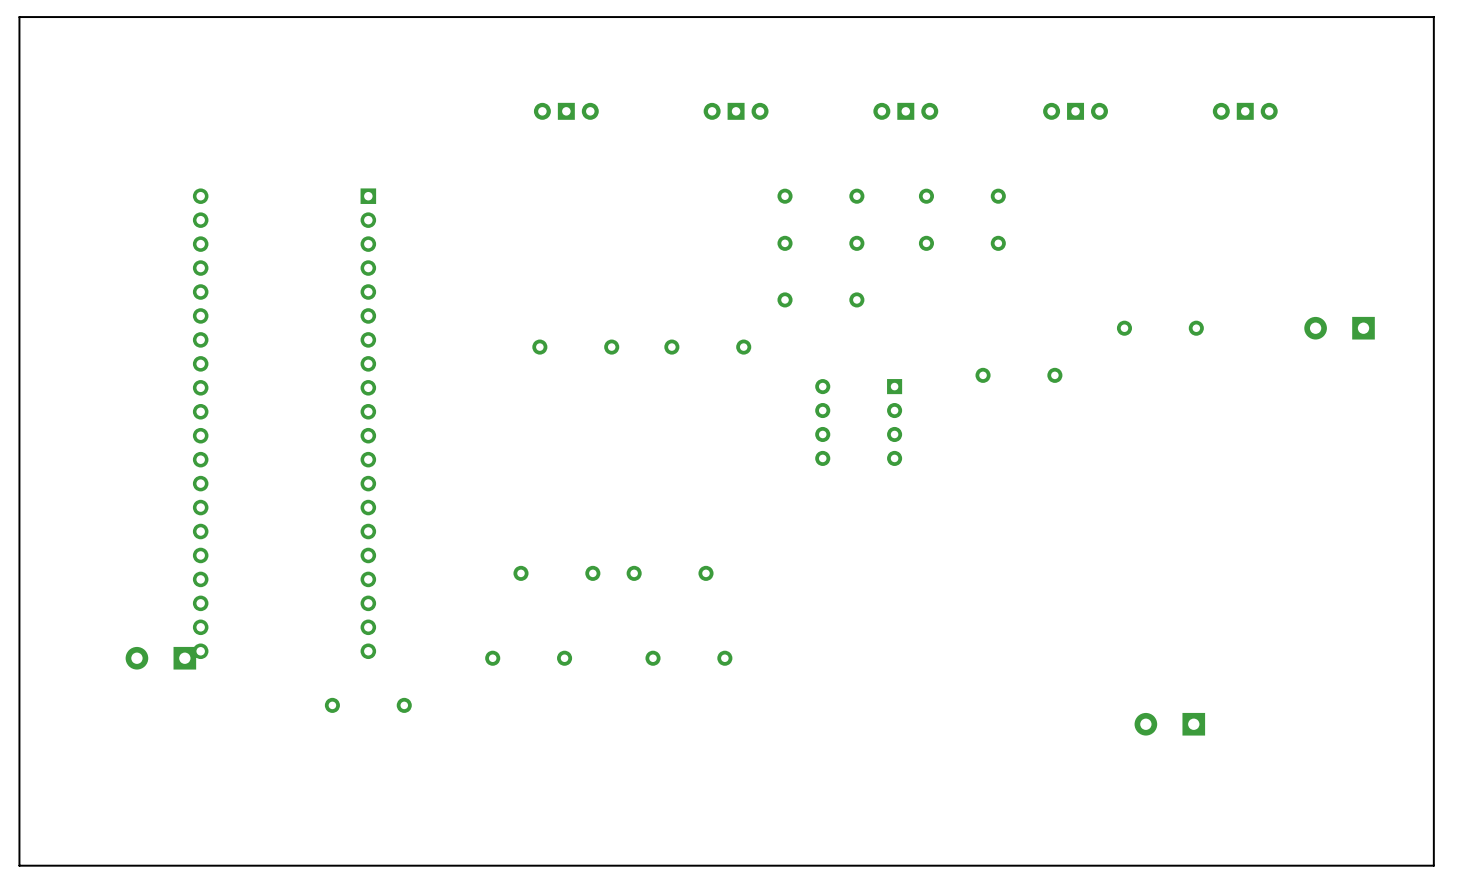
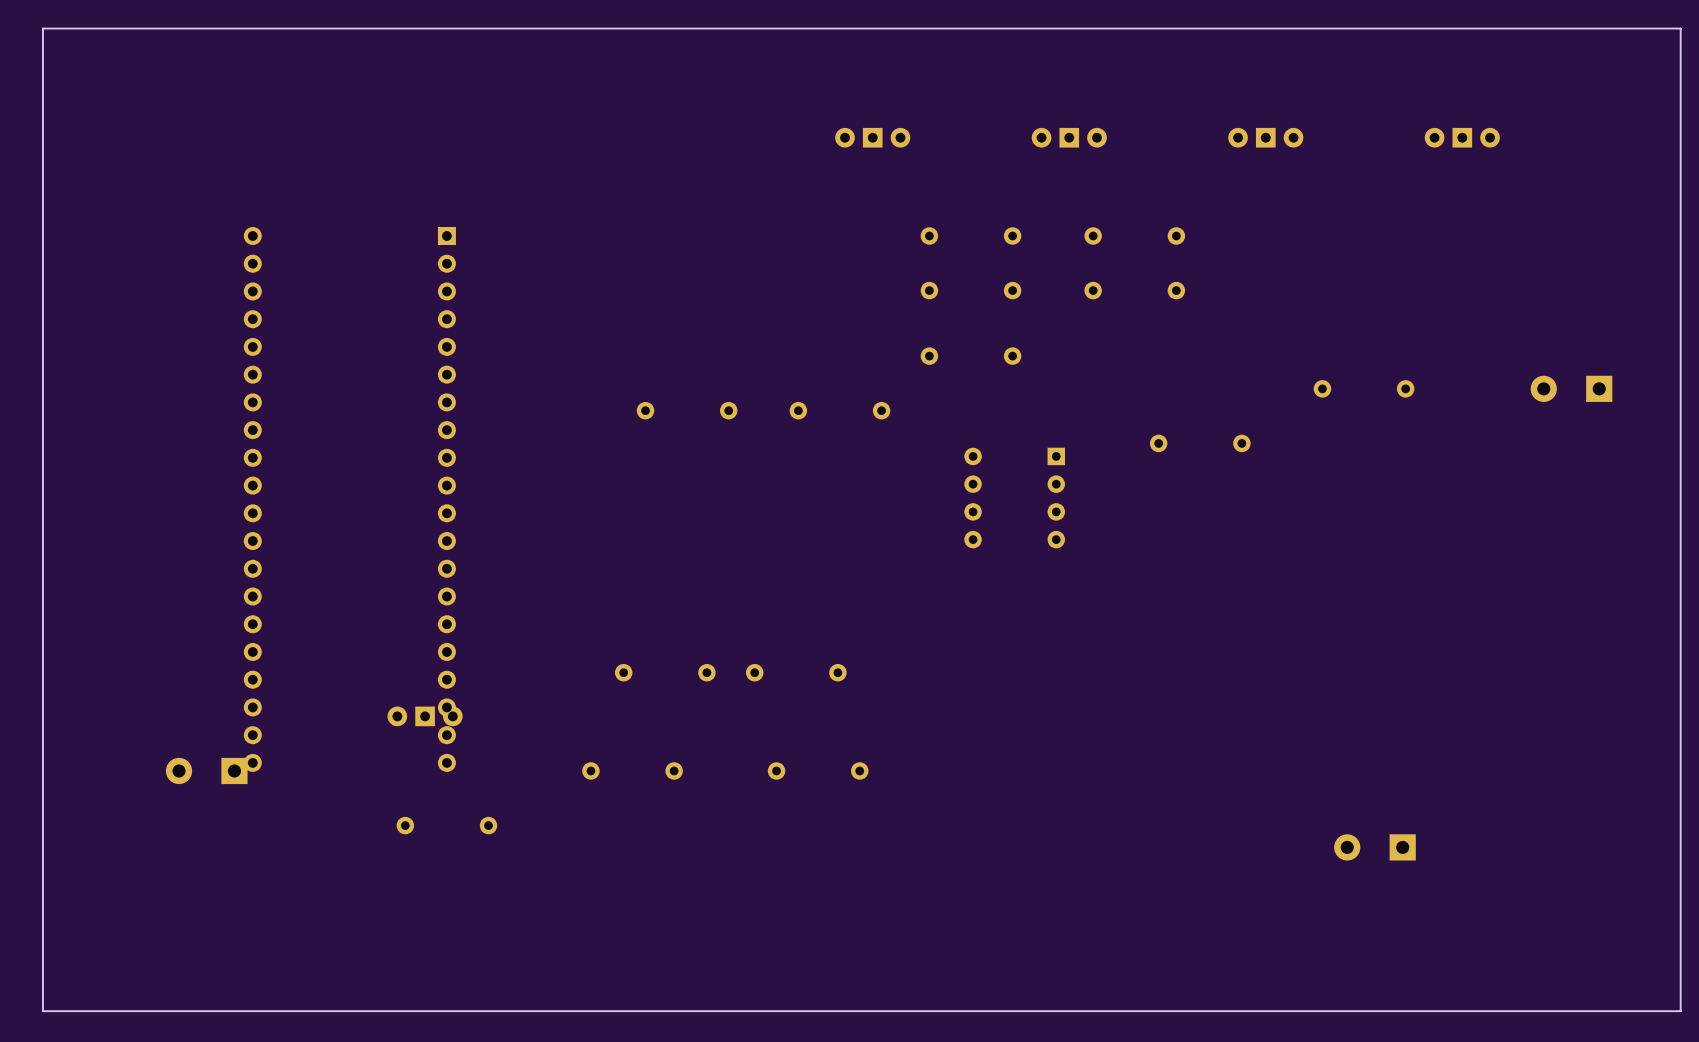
part: (566, 111) -> none
part: none -> (425, 716)

